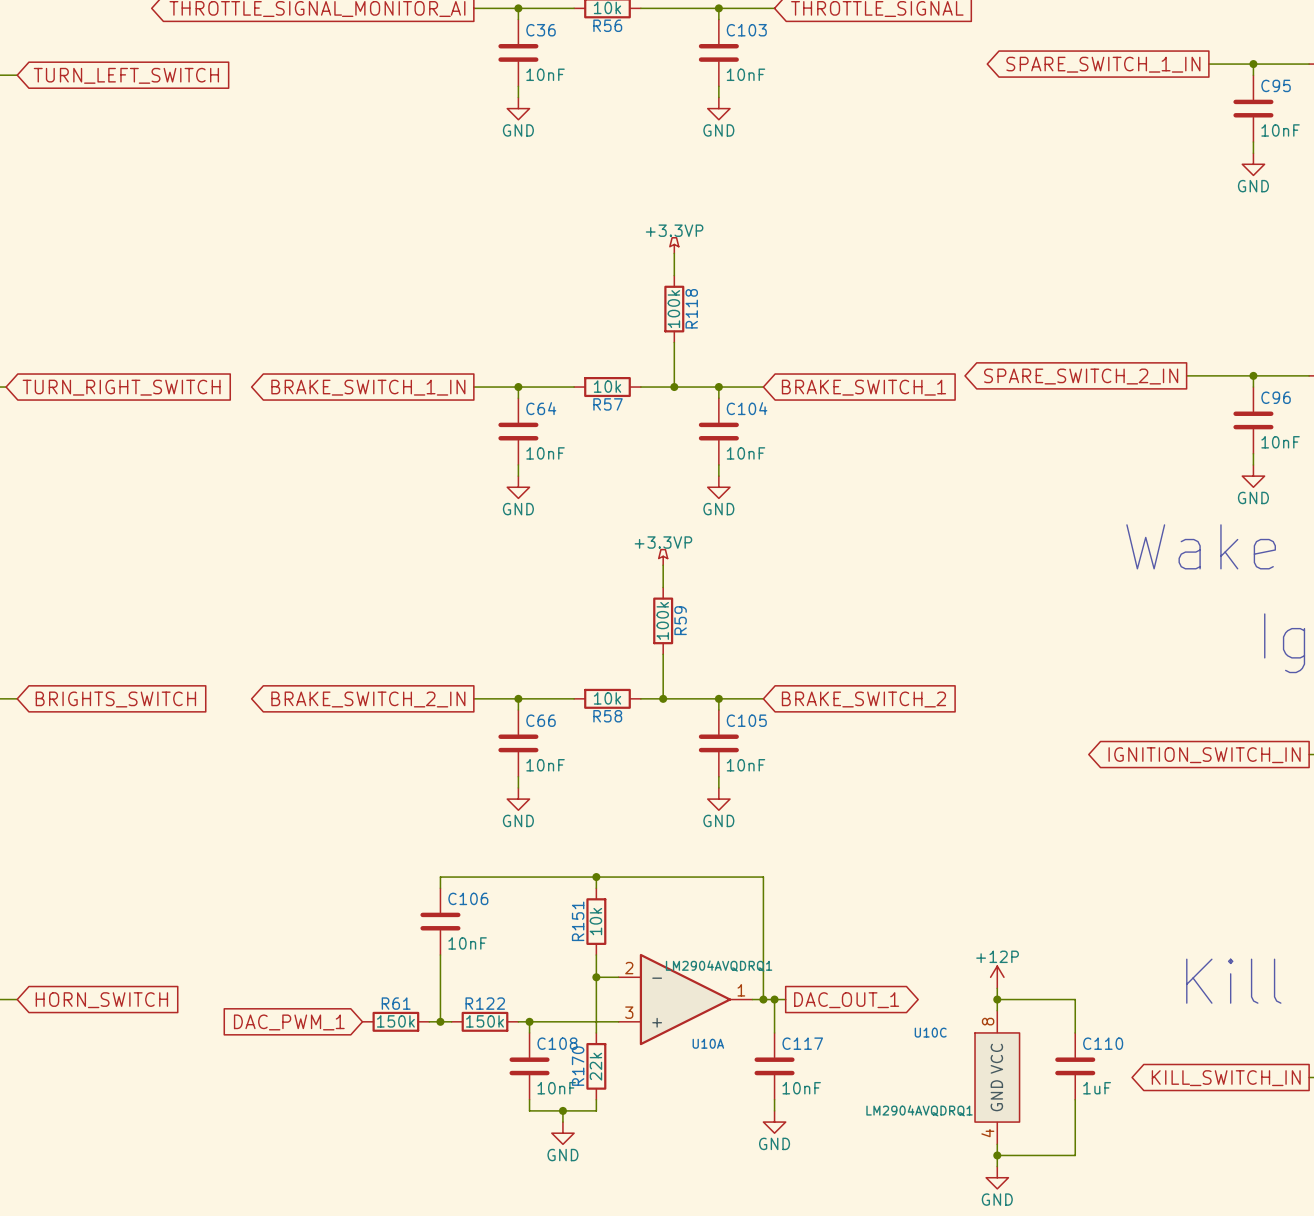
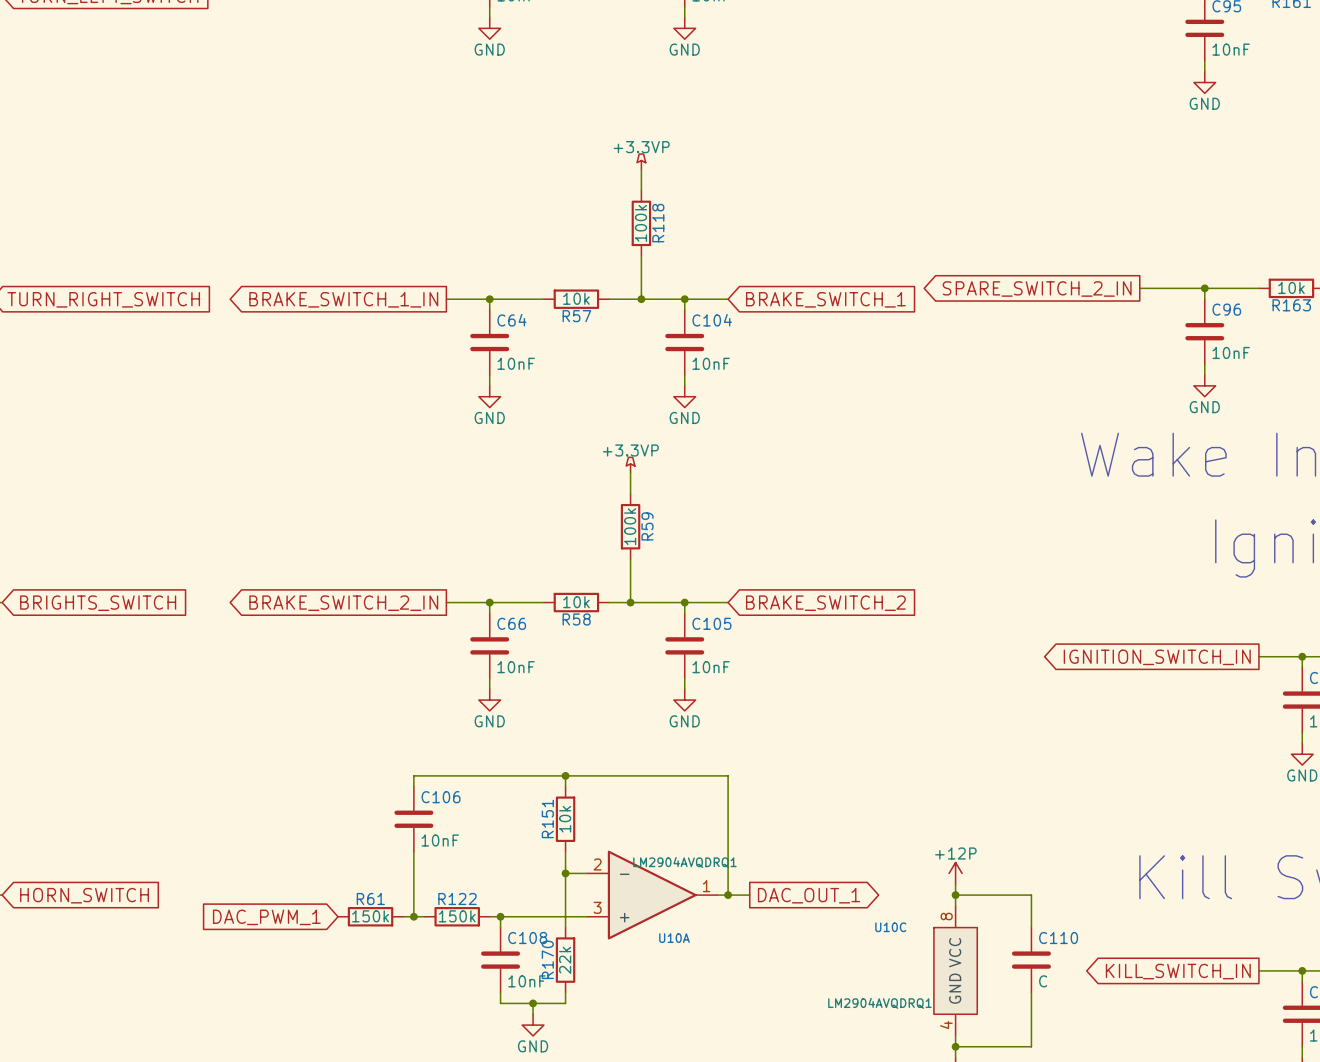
wire: (774, 999) (774, 1032) -> none
junction: (774, 999) -> none
C117: 10nF (774, 1066) -> none
C110 value: 1uF (1097, 1088) -> C (1043, 981)
wire: (774, 1099) (774, 1110) -> none
power symbol: GND (774, 1122) -> none

